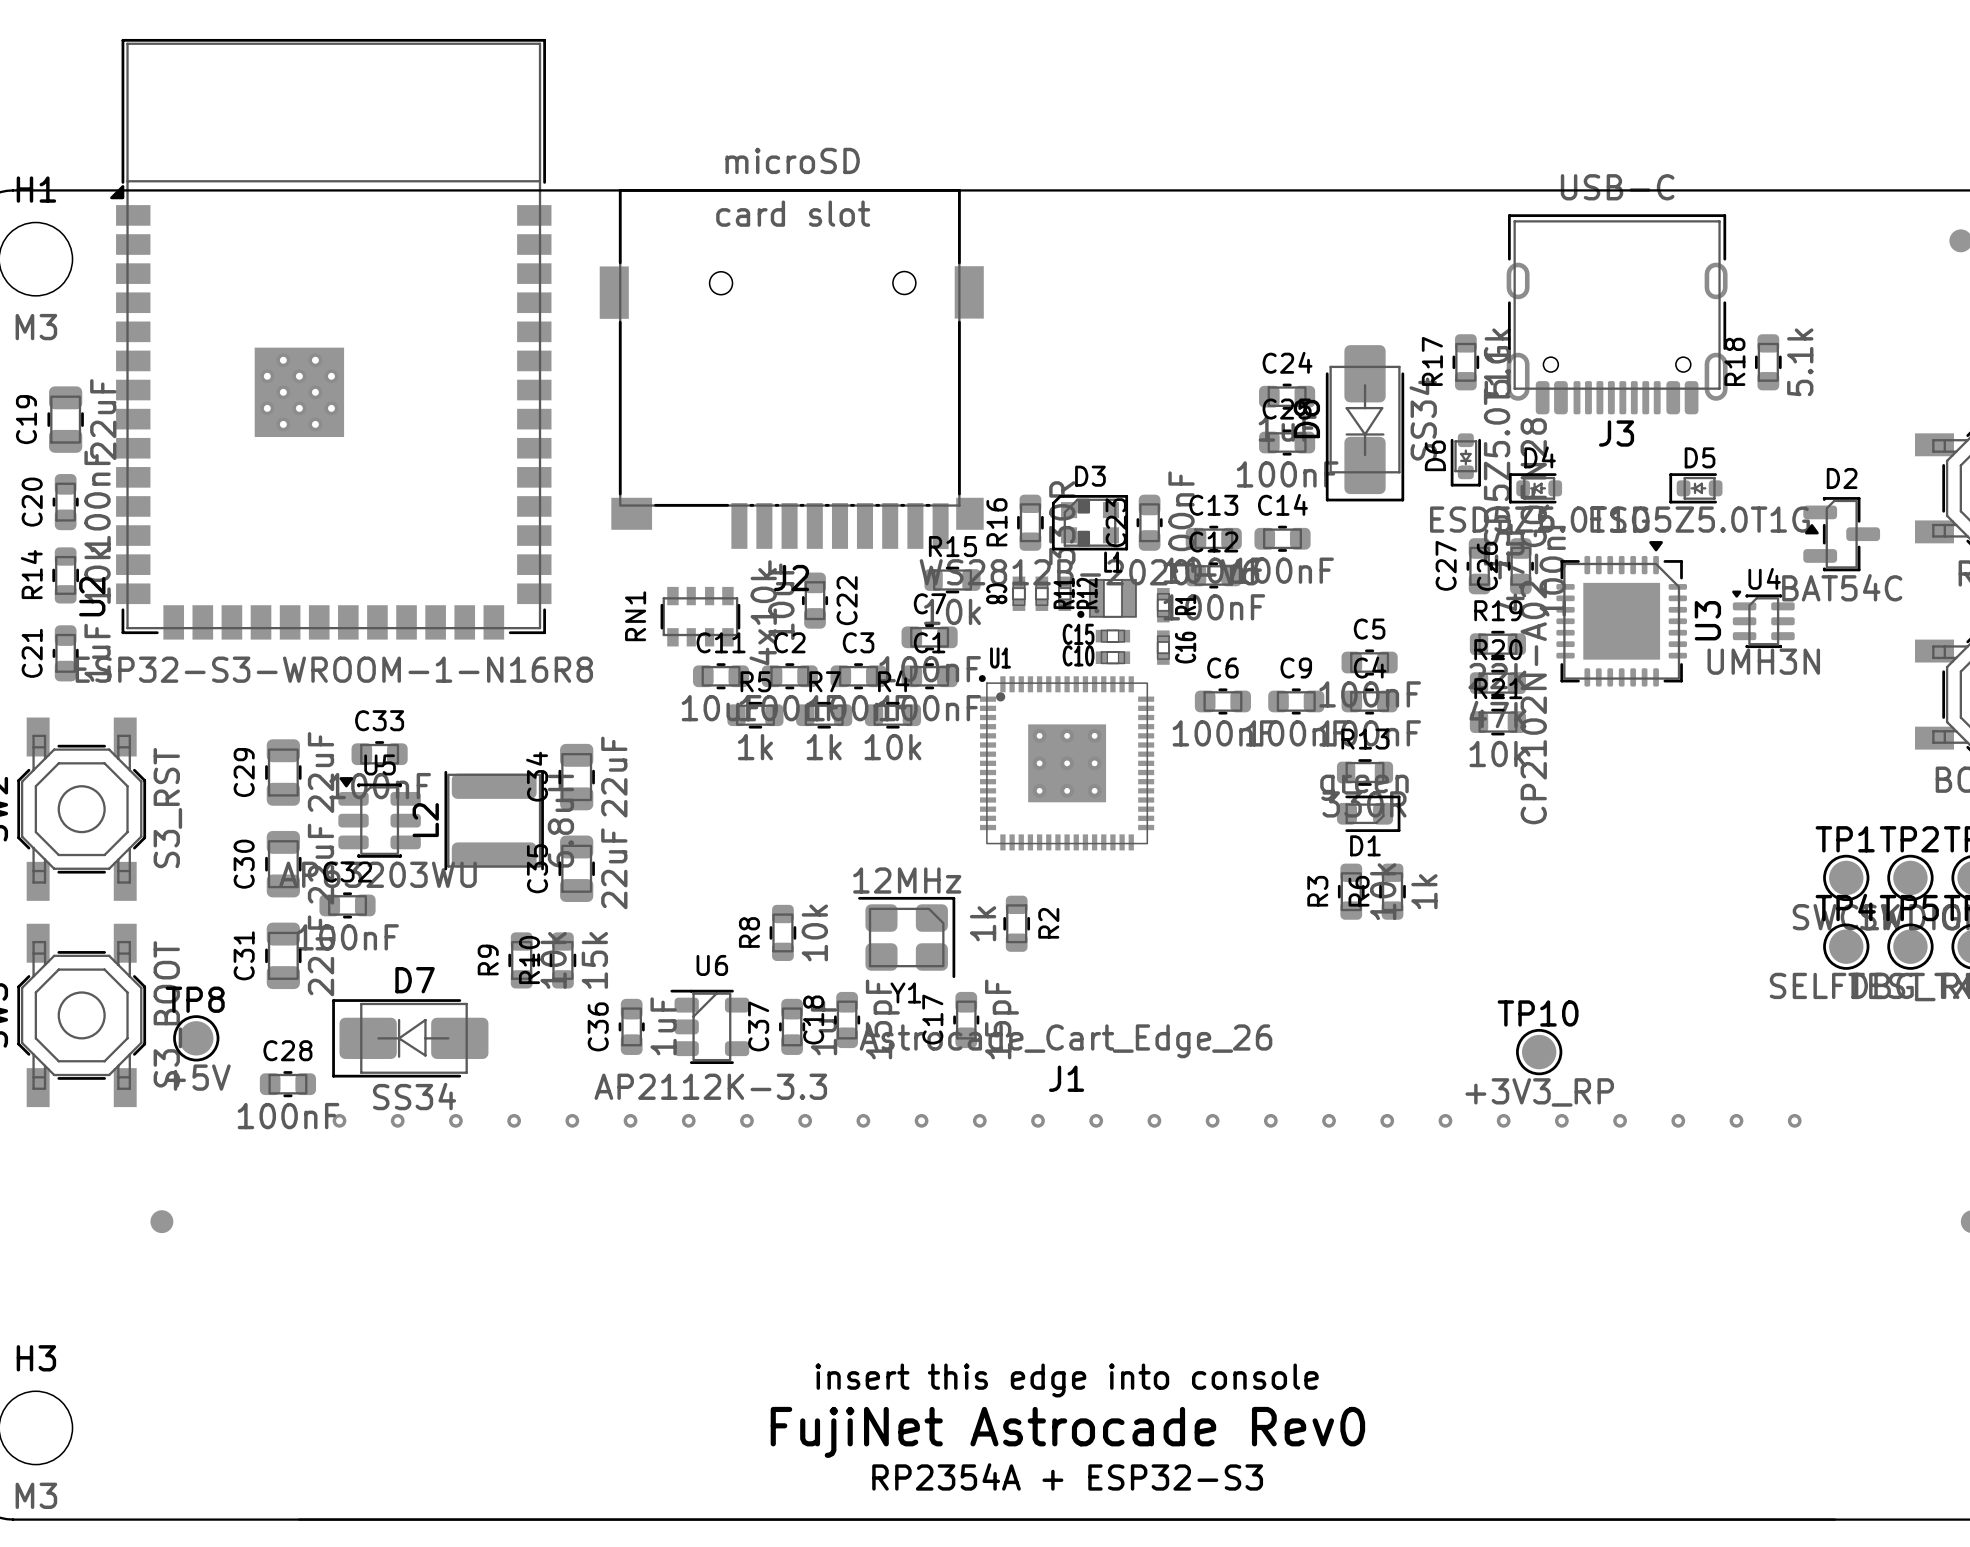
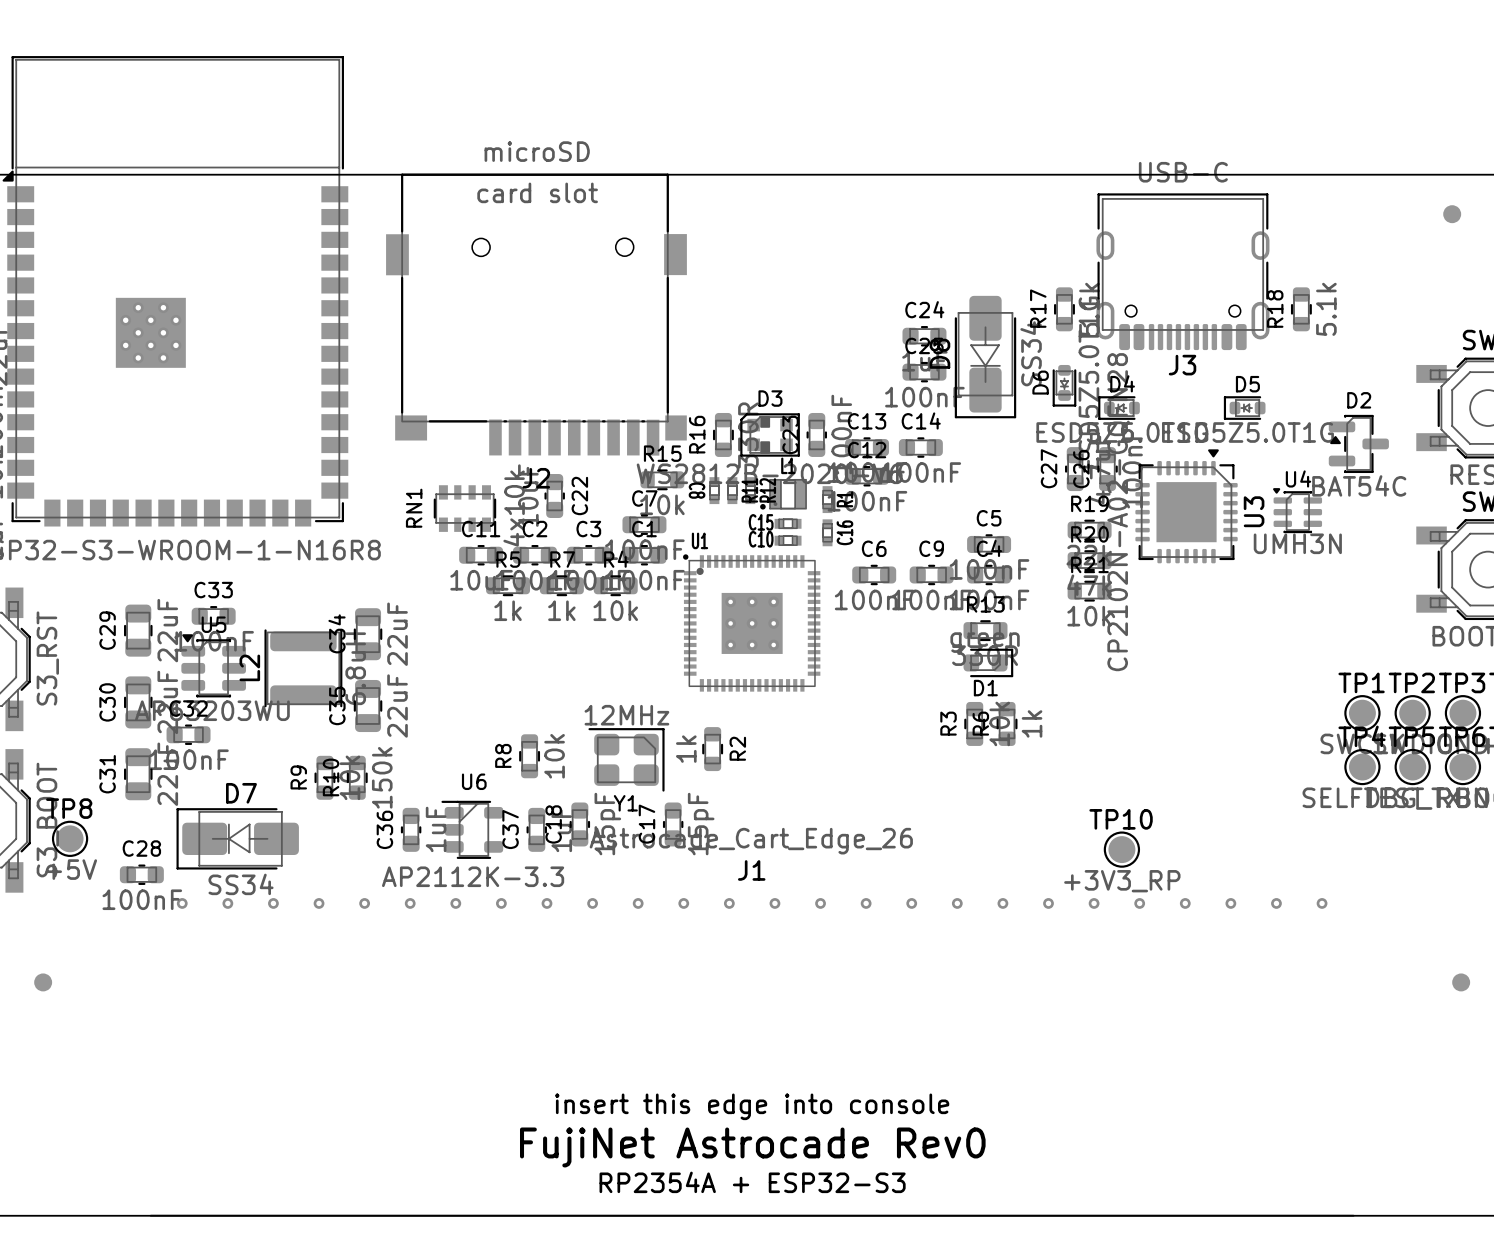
R10 value: 15k (594, 960) -> 150k (382, 777)

